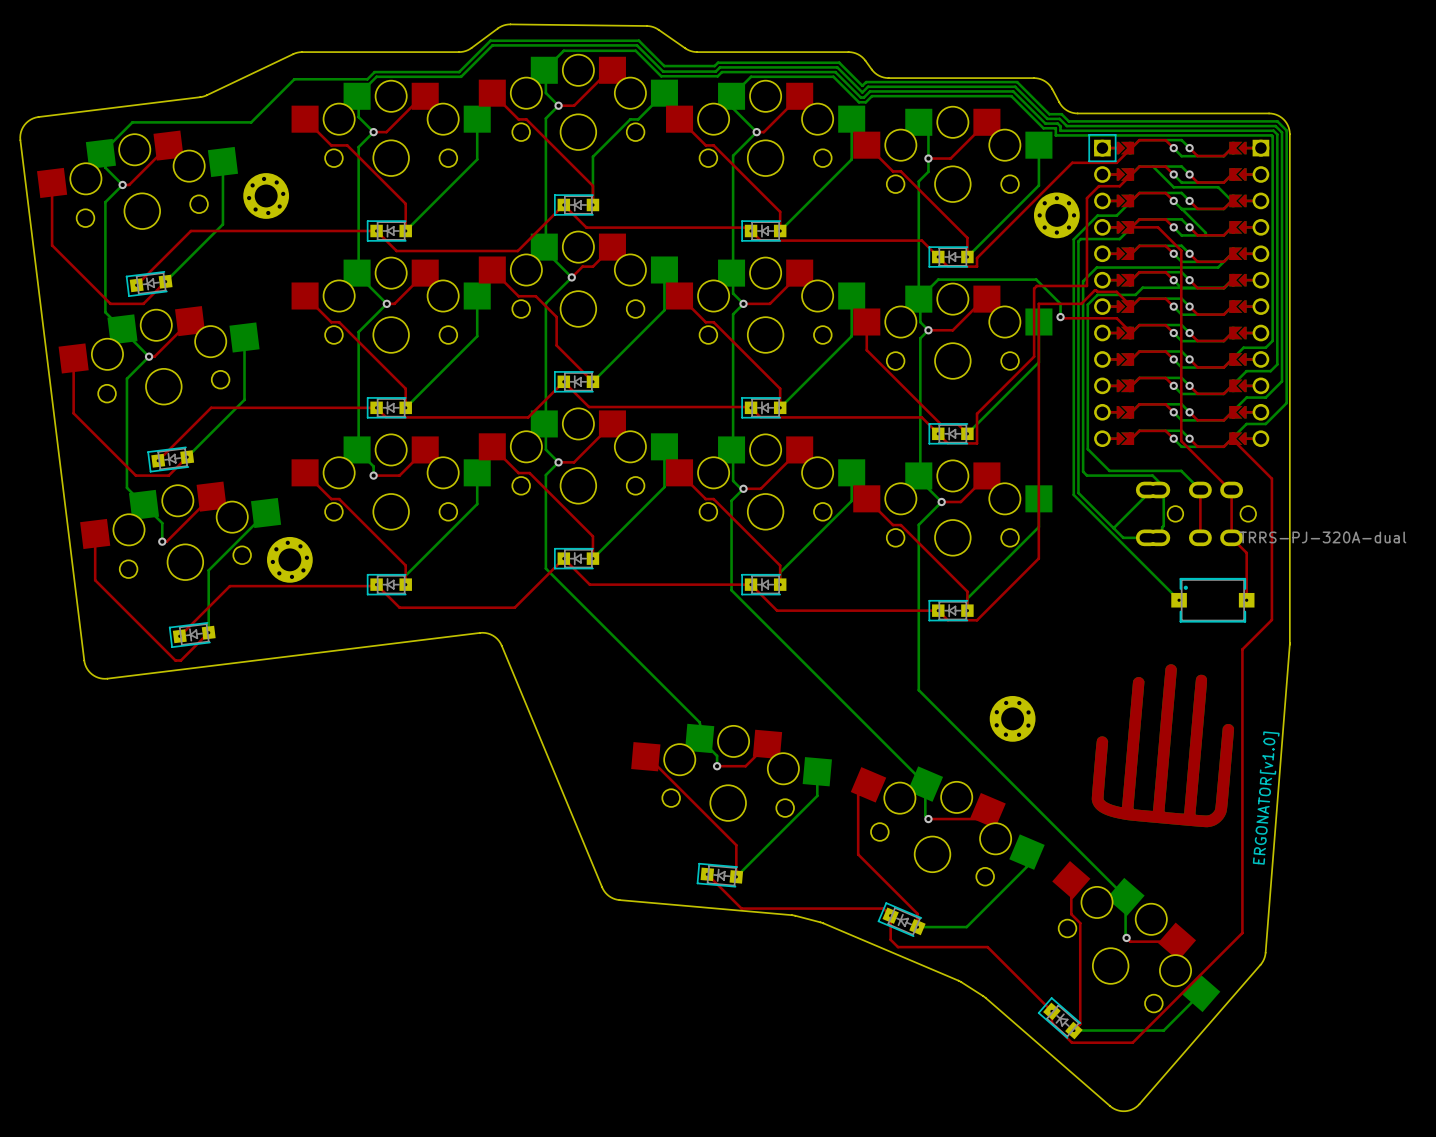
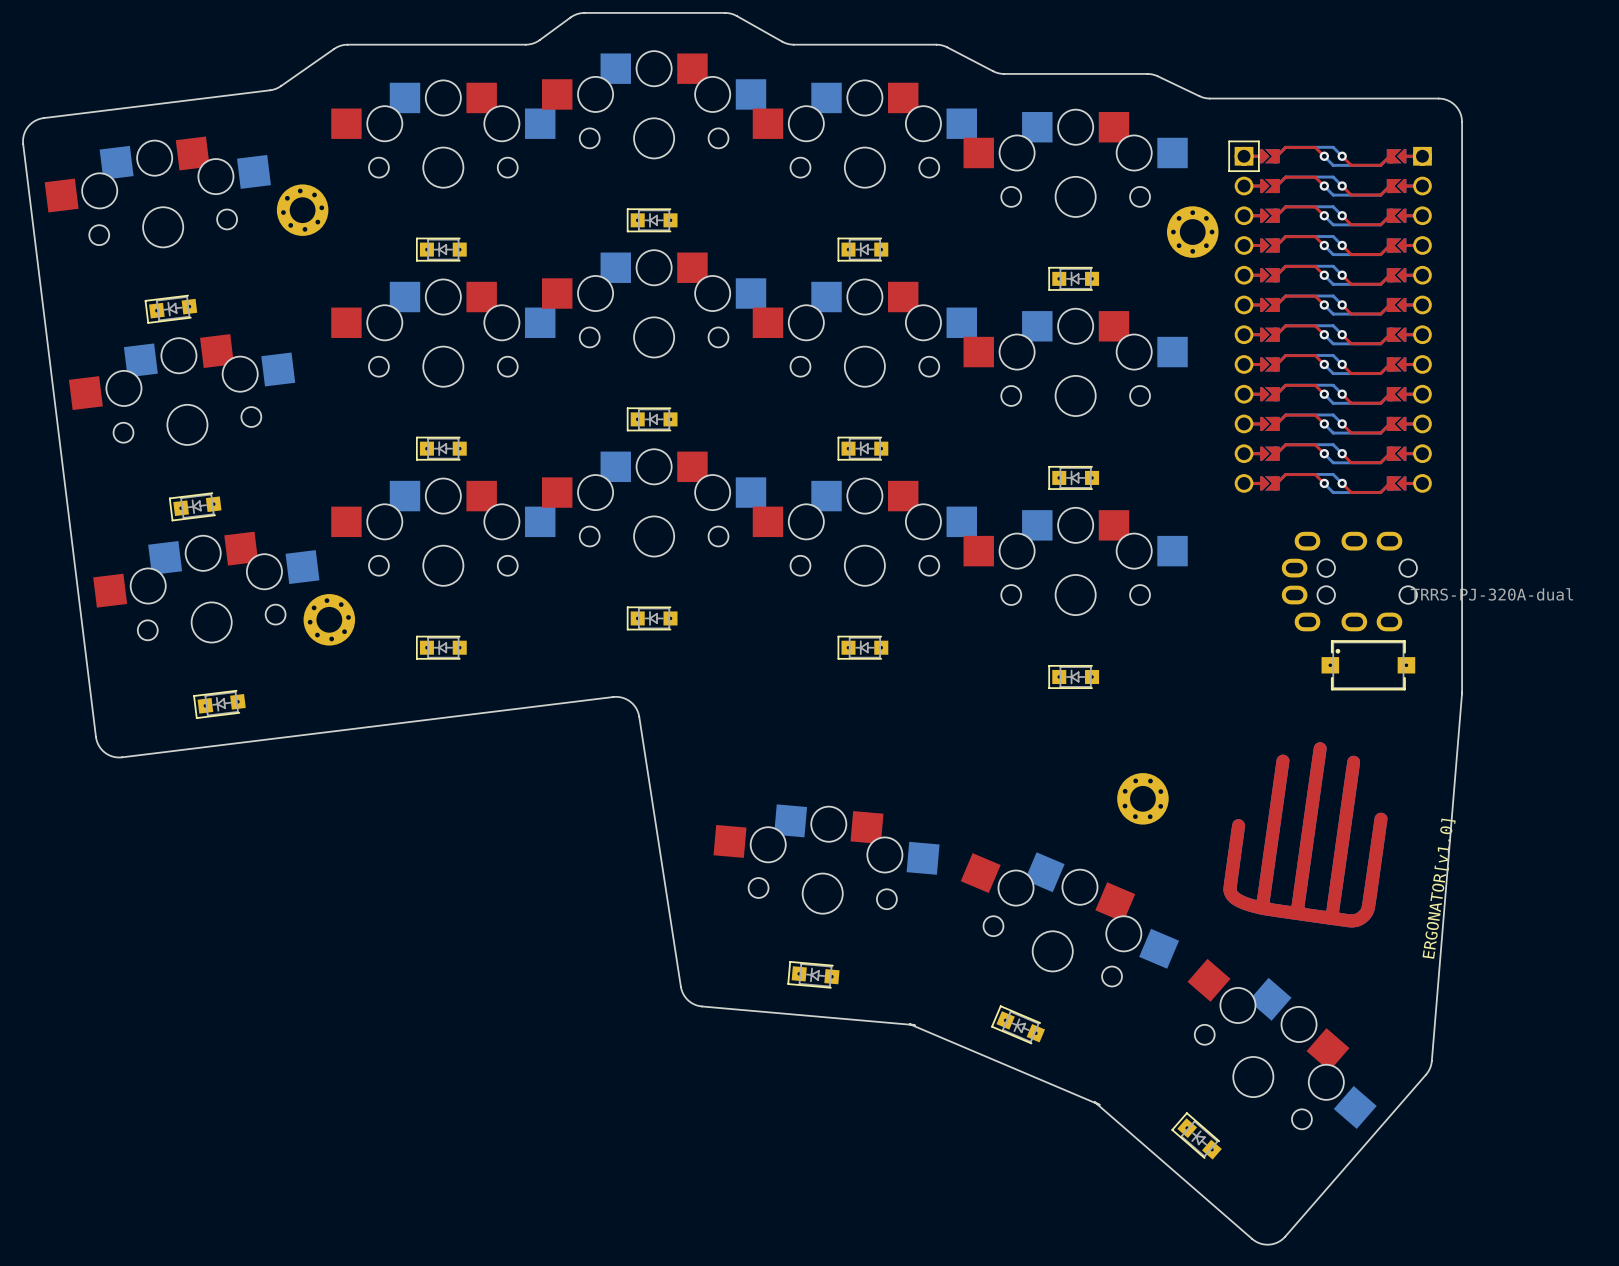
board edge: (510, 24) (648, 26) (656, 28) (687, 49) (695, 51) (851, 52) (862, 57) (877, 74) (886, 77) (1036, 78) (1049, 85) (1063, 107) (1075, 113) (1269, 113) (1280, 116) (1286, 123) (1289, 134) (1289, 643) (1265, 954) (1260, 964) (1134, 1108) (1122, 1111) (1112, 1107) (985, 997) (961, 982) (823, 923) (791, 915) (619, 900) (609, 896) (602, 887) (501, 645) (497, 638) (490, 634) (479, 632) (107, 678) (96, 676) (87, 669) (84, 660) (20, 140) (23, 127) (28, 121) (38, 117) (203, 96) (297, 52) (463, 51) (499, 27) (510, 24) -> (584, 12) (572, 16) (539, 40) (530, 44) (342, 45) (334, 48) (273, 89) (43, 118) (32, 122) (26, 129) (23, 144) (98, 744) (106, 754) (122, 757) (613, 697) (625, 698) (634, 705) (639, 716) (680, 986) (684, 996) (690, 1001) (701, 1006) (914, 1025) (909, 1024) (1099, 1104) (1094, 1102) (1252, 1238) (1254, 1240) (1266, 1244) (1279, 1241) (1426, 1074) (1431, 1063) (1462, 693) (1462, 121) (1458, 110) (1450, 101) (1438, 98) (1207, 98) (1150, 74) (998, 73) (939, 44) (790, 44) (728, 13) (584, 12)
top track: (612, 70) (609, 70) (574, 105) (558, 105) -> none
top track: (492, 93) (518, 119) (526, 119) (592, 185) (592, 204) -> none
bottom track: (664, 93) (638, 119) (630, 119) (592, 156) (592, 204) -> none
top track: (425, 96) (422, 96) (386, 132) (373, 132) -> none
top track: (799, 96) (763, 132) (756, 132) -> none
via: (558, 105) -> none
top track: (305, 119) (331, 145) (347, 145) (405, 203) (405, 230) -> none
bottom track: (477, 119) (477, 159) (405, 230) -> none
top track: (679, 119) (705, 145) (713, 145) (780, 211) (780, 230) -> none
bottom track: (851, 119) (851, 159) (780, 230) -> none
bottom track: (918, 122) (928, 131) (928, 171) (918, 181) (918, 299) -> none
top track: (986, 122) (950, 158) (928, 158) -> none
via: (373, 132) -> none
via: (756, 132) -> none
top track: (168, 145) (129, 184) (122, 184) -> none
top track: (866, 145) (893, 171) (900, 171) (967, 237) (967, 256) -> none
bottom track: (1038, 145) (1038, 185) (967, 256) -> none
top track: (1131, 148) (1116, 162) (1072, 162) (977, 258) (977, 266) (947, 266) (921, 240) (760, 240) (747, 227) (586, 227) (563, 204) (517, 251) (396, 251) (376, 230) (190, 230) (136, 285) -> none
via: (928, 158) -> none
bottom track: (222, 161) (222, 224) (165, 281) -> none
bottom track: (1153, 166) (1173, 187) (1218, 187) (1231, 200) -> none
top track: (1131, 174) (1119, 186) (1098, 186) (1086, 198) (1086, 285) (1036, 285) (1034, 288) (1034, 356) (977, 413) (977, 443) (947, 443) (921, 417) (760, 417) (750, 407) (589, 407) (563, 381) (528, 417) (386, 417) (376, 407) (211, 407) (158, 460) -> none
top track: (52, 182) (52, 245) (110, 303) (143, 303) (165, 281) -> none
via: (122, 184) -> none
bottom track: (1131, 200) (1116, 215) (1097, 215) (1073, 239) (1073, 494) (1179, 600) -> none
bottom track: (1181, 209) (1205, 232) (1205, 235) -> none
top track: (1131, 227) (1158, 227) (1181, 250) (1181, 441) (1231, 489) (1231, 537) (1246, 552) (1246, 600) -> none
bottom track: (1131, 227) (1119, 239) (1080, 239) (1078, 241) (1078, 492) (1123, 537) (1143, 537) -> none
top track: (612, 247) (592, 266) (582, 266) (571, 277) -> none
bottom track: (1231, 253) (1218, 267) (1096, 267) (1083, 281) (1083, 471) (1086, 475) (1152, 475) (1163, 486) (1162, 537) -> none
top track: (492, 269) (518, 296) (535, 296) (556, 317) (556, 345) (592, 381) -> none
bottom track: (664, 269) (664, 310) (592, 381) -> none
top track: (425, 273) (394, 303) (386, 303) -> none
top track: (799, 273) (769, 303) (743, 303) -> none
via: (571, 277) -> none
bottom track: (1224, 287) (1142, 287) (1135, 294) (1097, 294) (1087, 304) (1087, 449) (1109, 470) (1181, 470) (1200, 489) -> none
top track: (305, 296) (331, 322) (339, 322) (405, 388) (405, 407) -> none
bottom track: (477, 296) (477, 336) (405, 407) -> none
top track: (679, 296) (705, 322) (713, 322) (780, 388) (780, 407) -> none
bottom track: (851, 296) (851, 336) (780, 407) -> none
bottom track: (918, 299) (938, 279) (1036, 279) (1060, 303) (1060, 317) -> none
bottom track: (918, 299) (920, 322) (928, 330) (920, 338) (920, 474) (918, 475) (920, 480) (941, 502) (918, 524) (918, 690) (1126, 898) (1125, 896) (1125, 936) (1126, 937) -> none
top track: (986, 299) (983, 299) (952, 330) (928, 330) -> none
via: (386, 303) -> none
via: (743, 303) -> none
top track: (1131, 306) (1116, 291) (1096, 290) (1081, 303) (1038, 303) (1038, 558) (977, 620) (947, 620) (938, 610) (777, 610) (751, 584) (589, 584) (563, 558) (514, 607) (399, 607) (376, 584) (229, 586) (179, 636) -> none
top track: (1060, 317) (1116, 318) (1131, 333) -> none
via: (1060, 317) -> none
top track: (190, 321) (154, 356) (149, 356) -> none
top track: (866, 322) (866, 350) (940, 424) (957, 424) (967, 433) -> none
bottom track: (1038, 322) (1038, 362) (967, 433) -> none
via: (928, 330) -> none
bottom track: (244, 337) (244, 399) (187, 457) -> none
via: (149, 356) -> none
top track: (73, 358) (73, 413) (135, 475) (168, 475) (187, 457) -> none
bottom track: (1231, 359) (1243, 347) (1265, 347) (1272, 340) (1271, 135) (1055, 135) (1055, 128) (1043, 128) (1011, 96) (871, 96) (865, 102) (858, 102) (833, 76) (751, 76) (731, 96) (733, 108) (756, 132) (733, 155) (733, 271) (731, 273) (733, 293) (743, 303) (733, 314) (733, 448) (731, 449) (733, 480) (741, 488) (743, 488) (731, 500) (731, 590) (925, 784) (925, 815) (928, 819) -> none
bottom track: (1231, 385) (1246, 371) (1270, 371) (1277, 364) (1277, 134) (1273, 130) (1060, 130) (1060, 126) (1057, 123) (1045, 123) (1013, 91) (870, 91) (863, 97) (860, 97) (835, 72) (721, 72) (717, 76) (661, 76) (635, 50) (563, 50) (544, 70) (545, 93) (558, 105) (545, 118) (545, 245) (544, 247) (545, 251) (571, 277) (545, 303) (545, 422) (544, 423) (545, 449) (558, 462) (545, 475) (545, 568) (699, 722) (703, 739) (699, 738) (717, 755) (717, 766) -> none
bottom track: (1231, 412) (1246, 397) (1265, 397) (1282, 381) (1282, 132) (1275, 126) (1066, 126) (1059, 118) (1047, 118) (1015, 86) (868, 86) (862, 92) (837, 67) (719, 67) (715, 71) (663, 71) (637, 45) (492, 45) (461, 76) (376, 76) (357, 96) (358, 117) (373, 132) (358, 147) (358, 271) (357, 273) (386, 303) (358, 332) (358, 448) (357, 449) (373, 466) (373, 475) -> none
top track: (612, 423) (574, 462) (558, 462) -> none
top track: (1231, 438) (1271, 478) (1271, 619) (1242, 649) (1242, 933) (1132, 1042) (1071, 1042) (1051, 1022) (1051, 1011) (987, 947) (897, 947) (890, 939) (890, 915) (883, 908) (741, 908) (707, 874) -> none
bottom track: (1231, 438) (1246, 423) (1265, 423) (1286, 403) (1286, 130) (1277, 121) (1068, 121) (1061, 114) (1049, 114) (1017, 82) (866, 82) (862, 85) (839, 62) (718, 62) (714, 66) (664, 66) (638, 40) (490, 40) (459, 72) (374, 72) (367, 79) (294, 79) (251, 122) (132, 122) (100, 153) (105, 158) (105, 167) (122, 184) (105, 202) (105, 312) (149, 356) (126, 378) (126, 487) (162, 523) (162, 541) -> none
top track: (492, 446) (518, 473) (529, 473) (592, 536) (592, 558) -> none
bottom track: (664, 446) (664, 487) (592, 558) -> none
top track: (425, 449) (399, 475) (373, 475) -> none
top track: (799, 449) (760, 488) (743, 488) -> none
via: (558, 462) -> none
top track: (305, 472) (331, 499) (339, 499) (405, 565) (405, 584) -> none
bottom track: (477, 472) (477, 504) (405, 575) (405, 584) -> none
top track: (679, 472) (705, 499) (713, 499) (780, 565) (780, 584) -> none
bottom track: (851, 472) (851, 501) (780, 572) (780, 584) -> none
via: (373, 475) -> none
top track: (986, 475) (960, 502) (941, 502) -> none
via: (743, 488) -> none
bottom track: (1143, 489) (1143, 497) (1113, 528) -> none
top track: (1200, 489) (1200, 537) -> none
top track: (211, 496) (166, 541) (162, 541) -> none
top track: (866, 498) (893, 525) (900, 525) (967, 591) (967, 610) -> none
bottom track: (1038, 498) (1038, 527) (967, 598) (967, 610) -> none
via: (941, 502) -> none
bottom track: (266, 513) (208, 570) (208, 632) -> none
part: TRRS-PJ-320A-dual (1195, 513) -> none
part: none -> TRRS-PJ-320A-dual (1349, 581)
top track: (95, 533) (95, 580) (175, 660) (180, 660) (208, 632) -> none
via: (162, 541) -> none
drawing: [1091, 664, 1235, 828] -> none
drawing: none -> [1223, 742, 1388, 928]
top track: (767, 744) (745, 766) (717, 766) -> none
top track: (645, 756) (736, 845) (736, 876) -> none
via: (717, 766) -> none
bottom track: (817, 771) (817, 795) (736, 876) -> none
top track: (868, 784) (858, 795) (858, 854) (917, 913) (917, 927) -> none
text rotation: 0° (1266, 798) -> 3° clockwise (1439, 888)
top track: (988, 810) (979, 819) (928, 819) -> none
via: (928, 819) -> none
bottom track: (1026, 852) (1026, 866) (966, 927) (917, 927) -> none
top track: (1071, 880) (1071, 914) (1080, 923) (1080, 1024) (1073, 1030) -> none
top track: (1126, 937) (1130, 941) (1177, 941) -> none
via: (1126, 937) -> none
bottom track: (1201, 993) (1163, 1030) (1073, 1030) -> none

